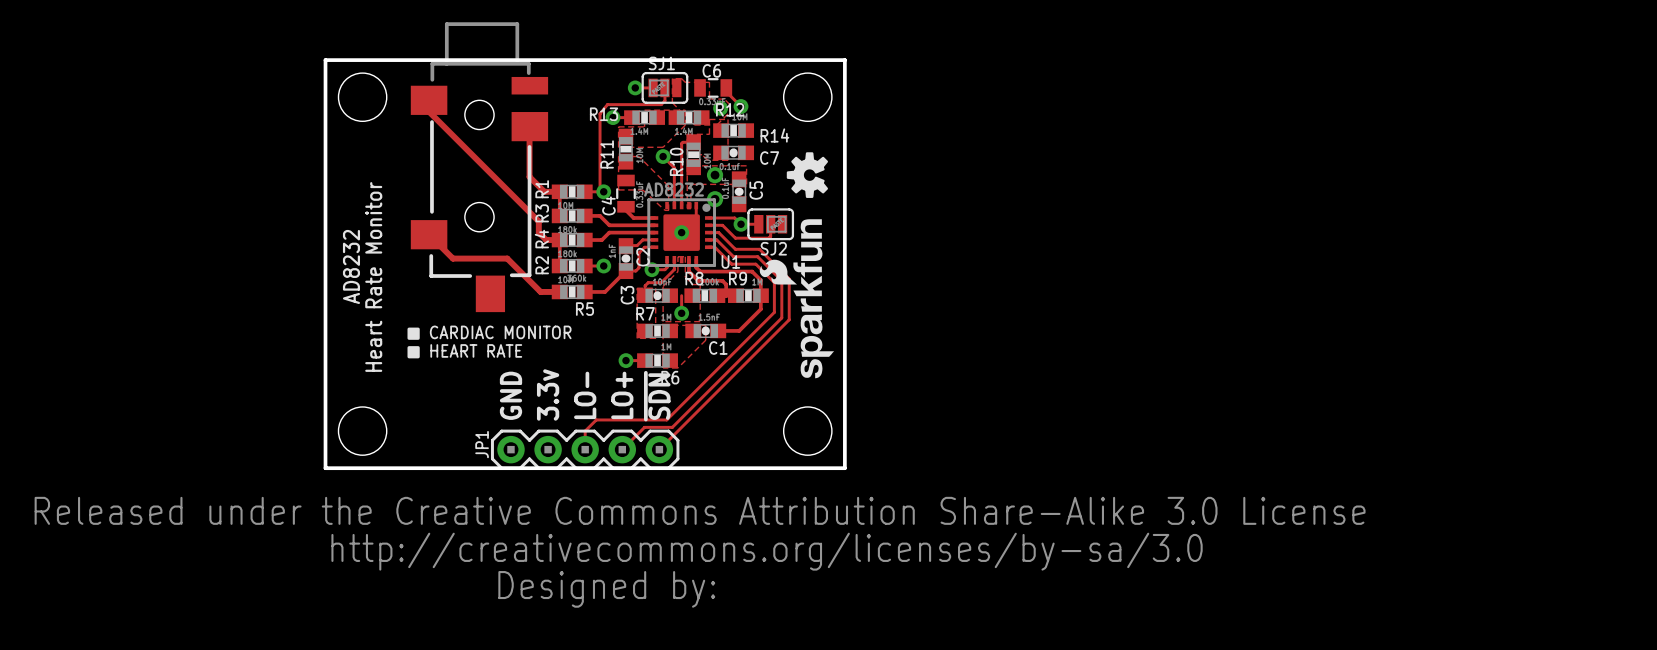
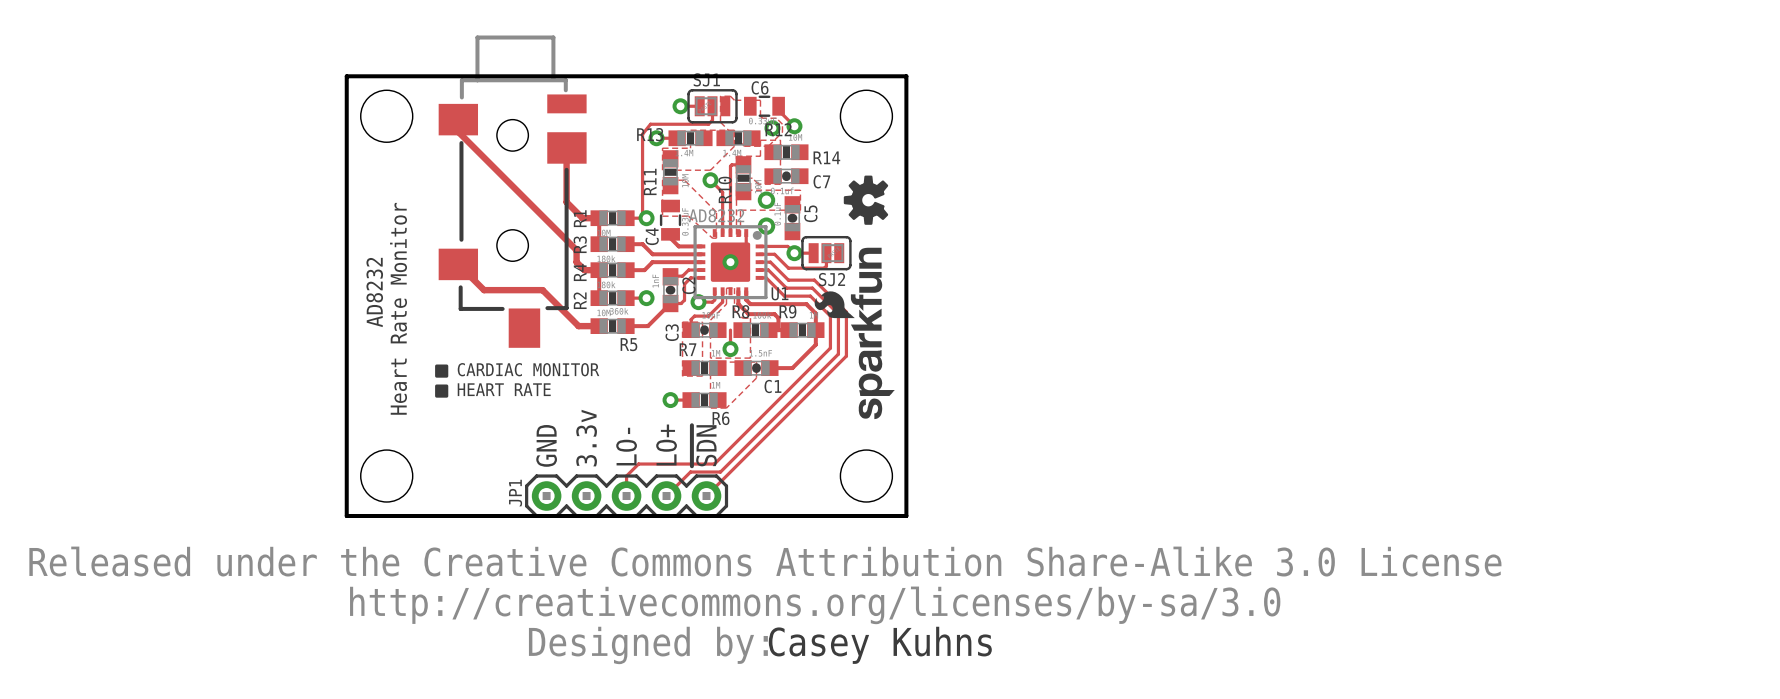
text: none -> Casey Kuhns (880, 645)

